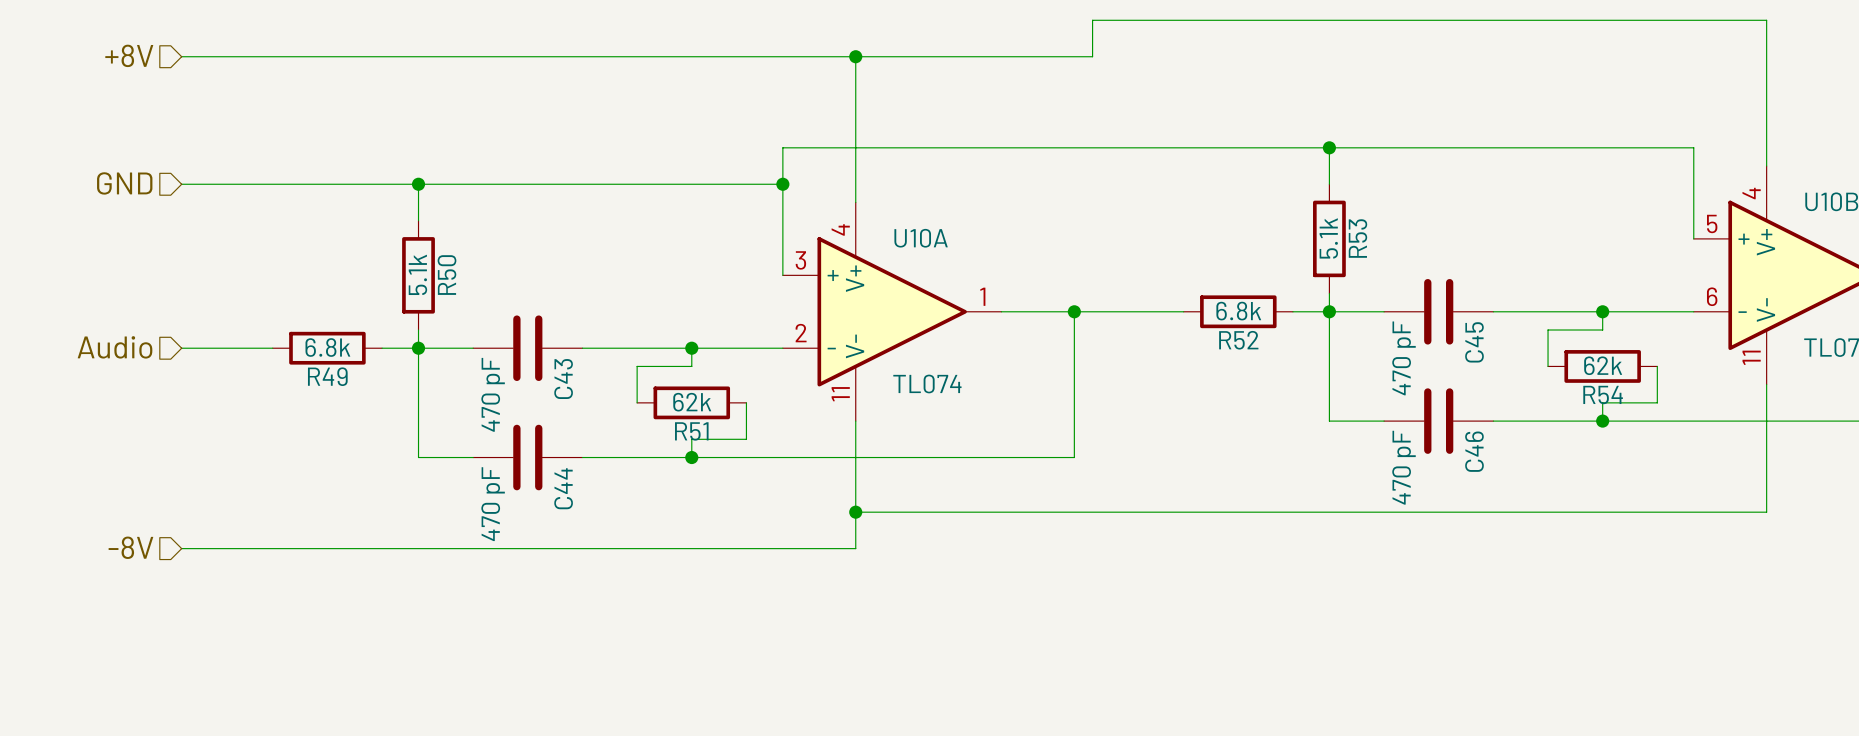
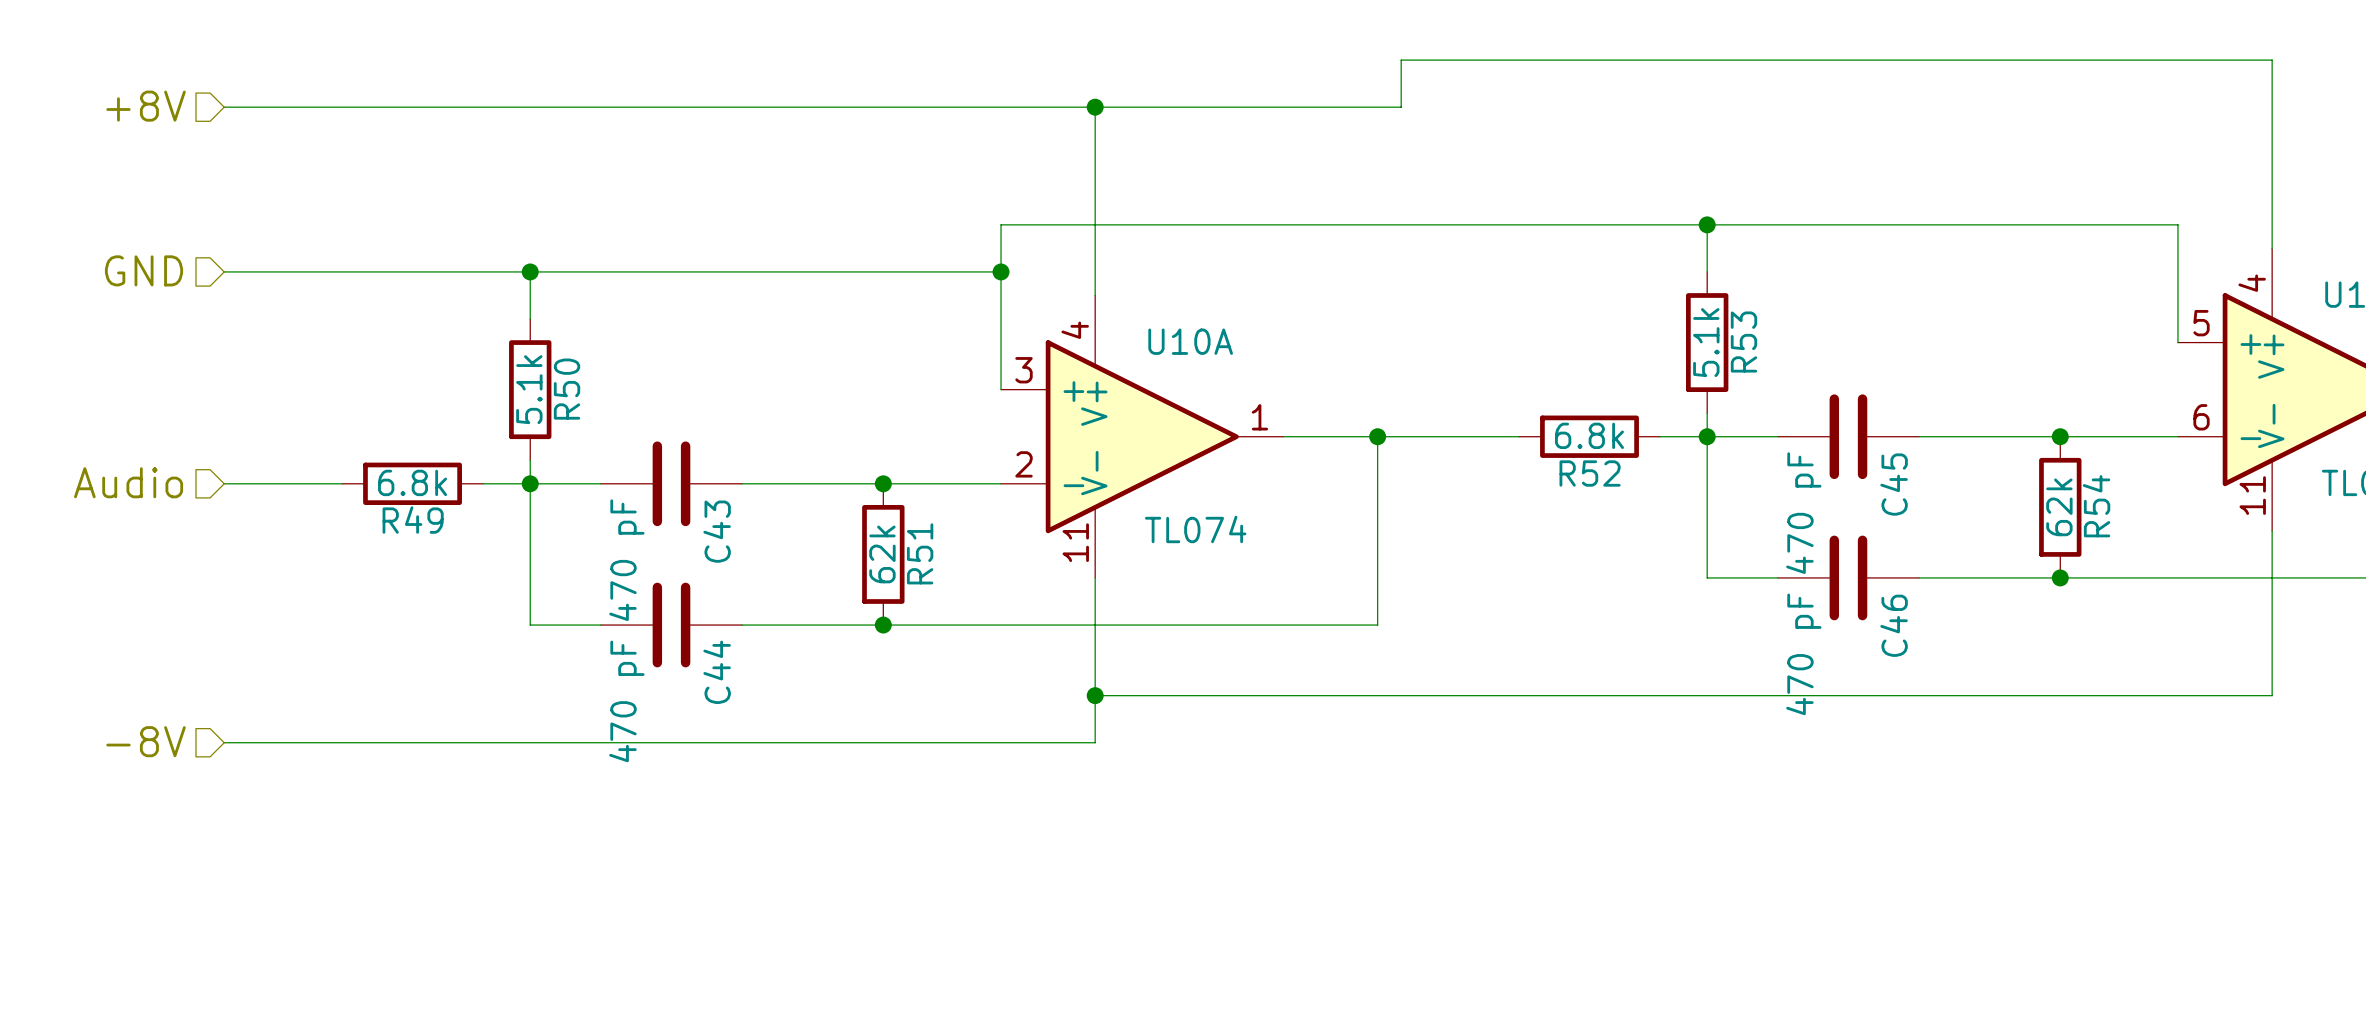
wire: (1602, 311) (1602, 330) (1548, 330) (1548, 366) -> none
wire: (691, 348) (691, 366) (637, 366) (637, 402) -> none
R54 rotation: 0° (1602, 366) -> 90° clockwise (2060, 507)
wire: (1657, 366) (1657, 402) (1602, 402) (1602, 421) -> none
R54 name position: R54 (1603, 394) -> R54 (2096, 506)
R51 rotation: 0° (691, 402) -> 90° clockwise (883, 554)
wire: (746, 402) (746, 439) (691, 439) (691, 457) -> none
R51 name position: R51 (691, 431) -> R51 (920, 553)

